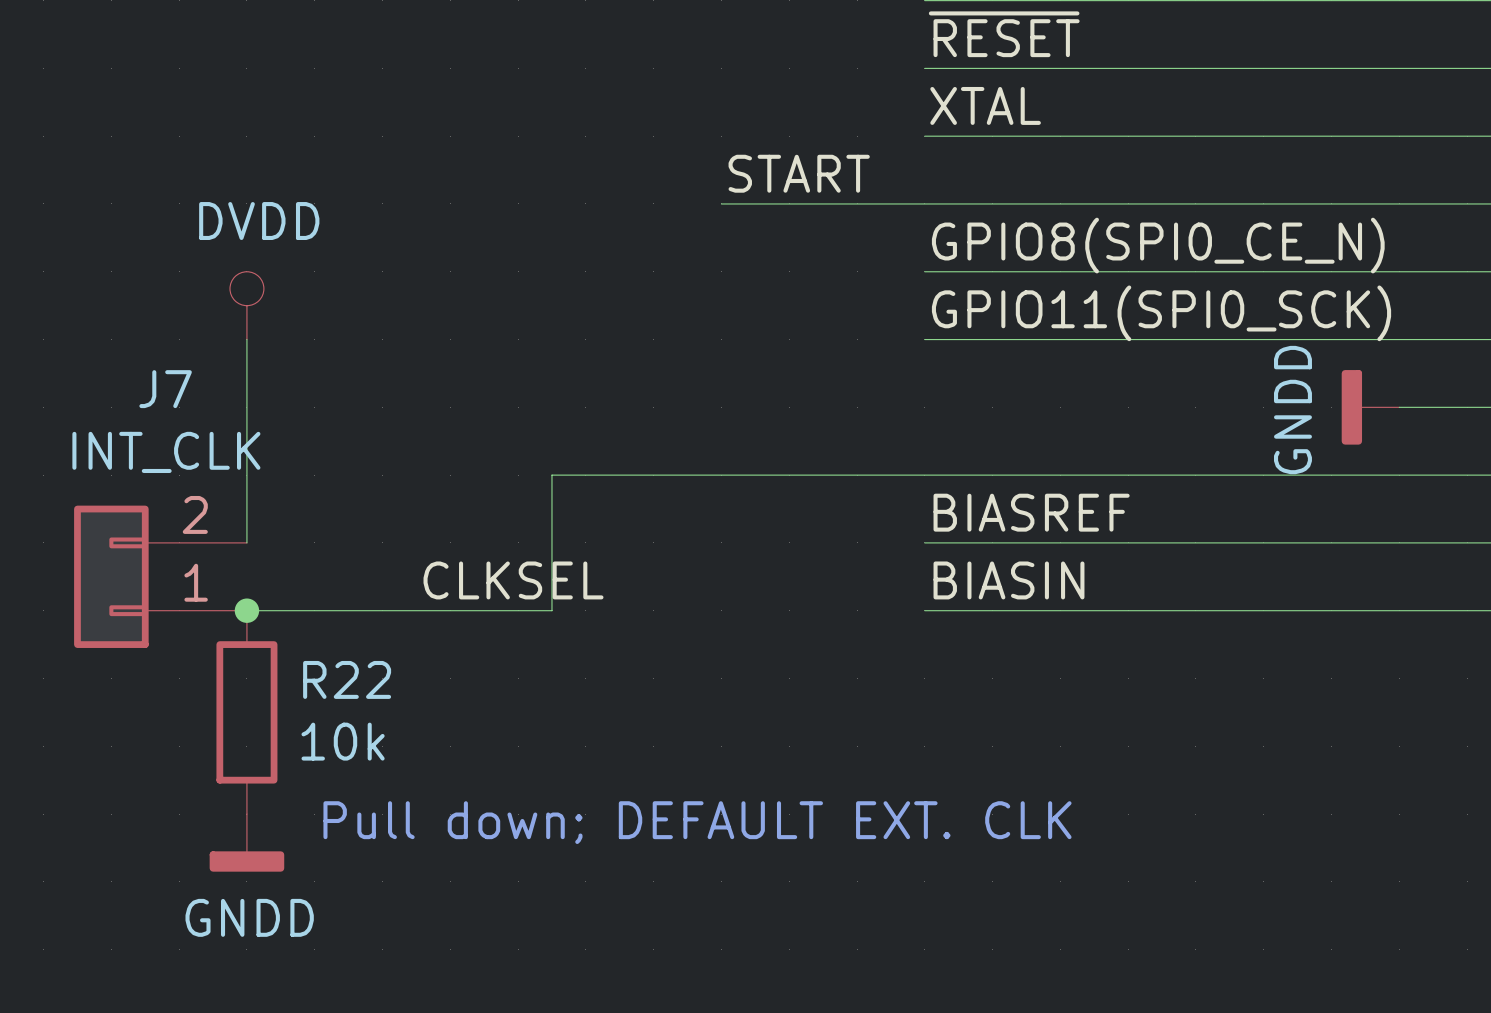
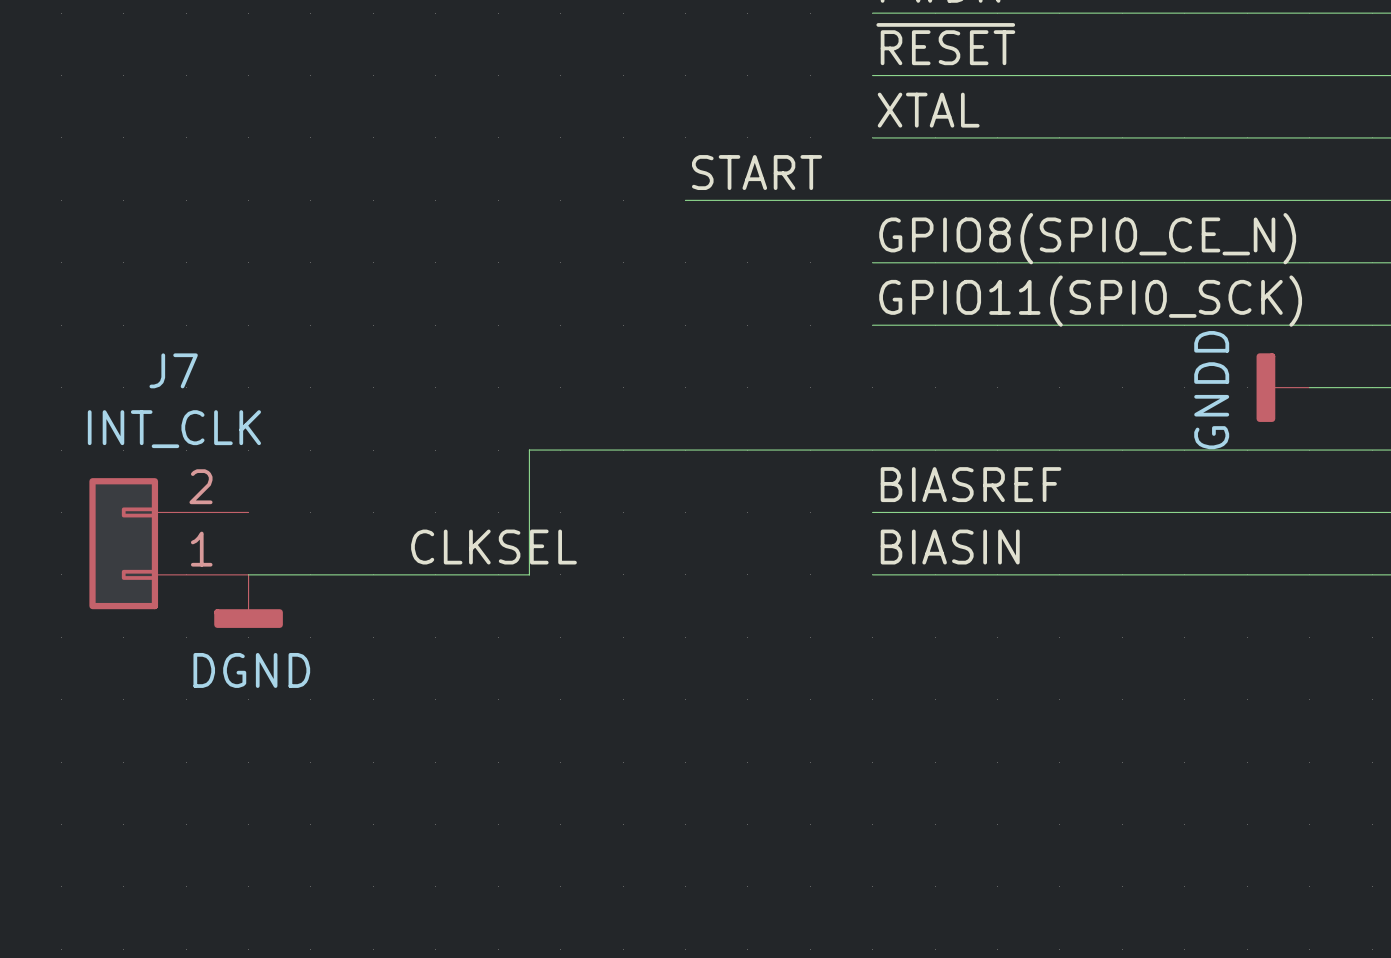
power symbol: DVDD (246, 305) -> none
wire: (246, 339) (246, 542) -> none
junction: (246, 610) -> none
power symbol: none -> DGND (248, 601)
R22: 10k (246, 712) -> none
text: Pull down; DEFAULT EXT. CLK (697, 822) -> none
power symbol: GNDD (246, 842) -> none

